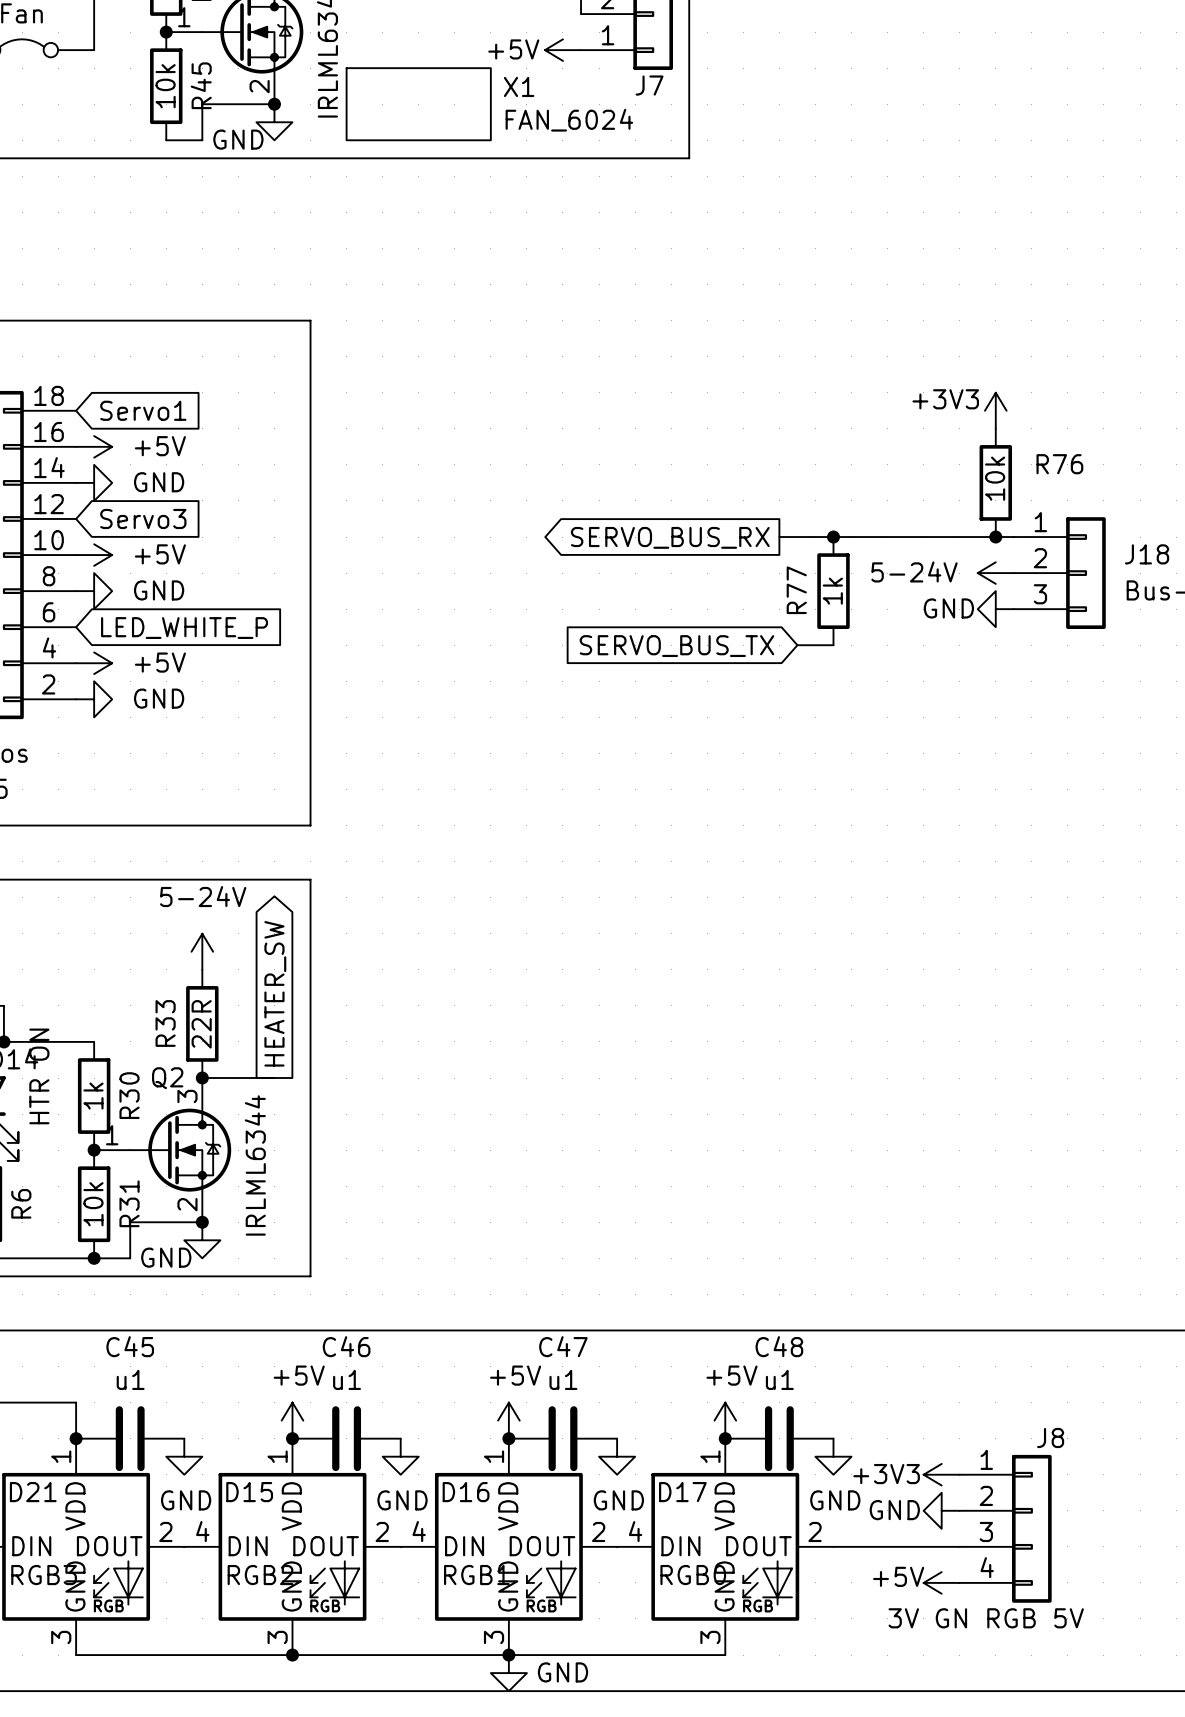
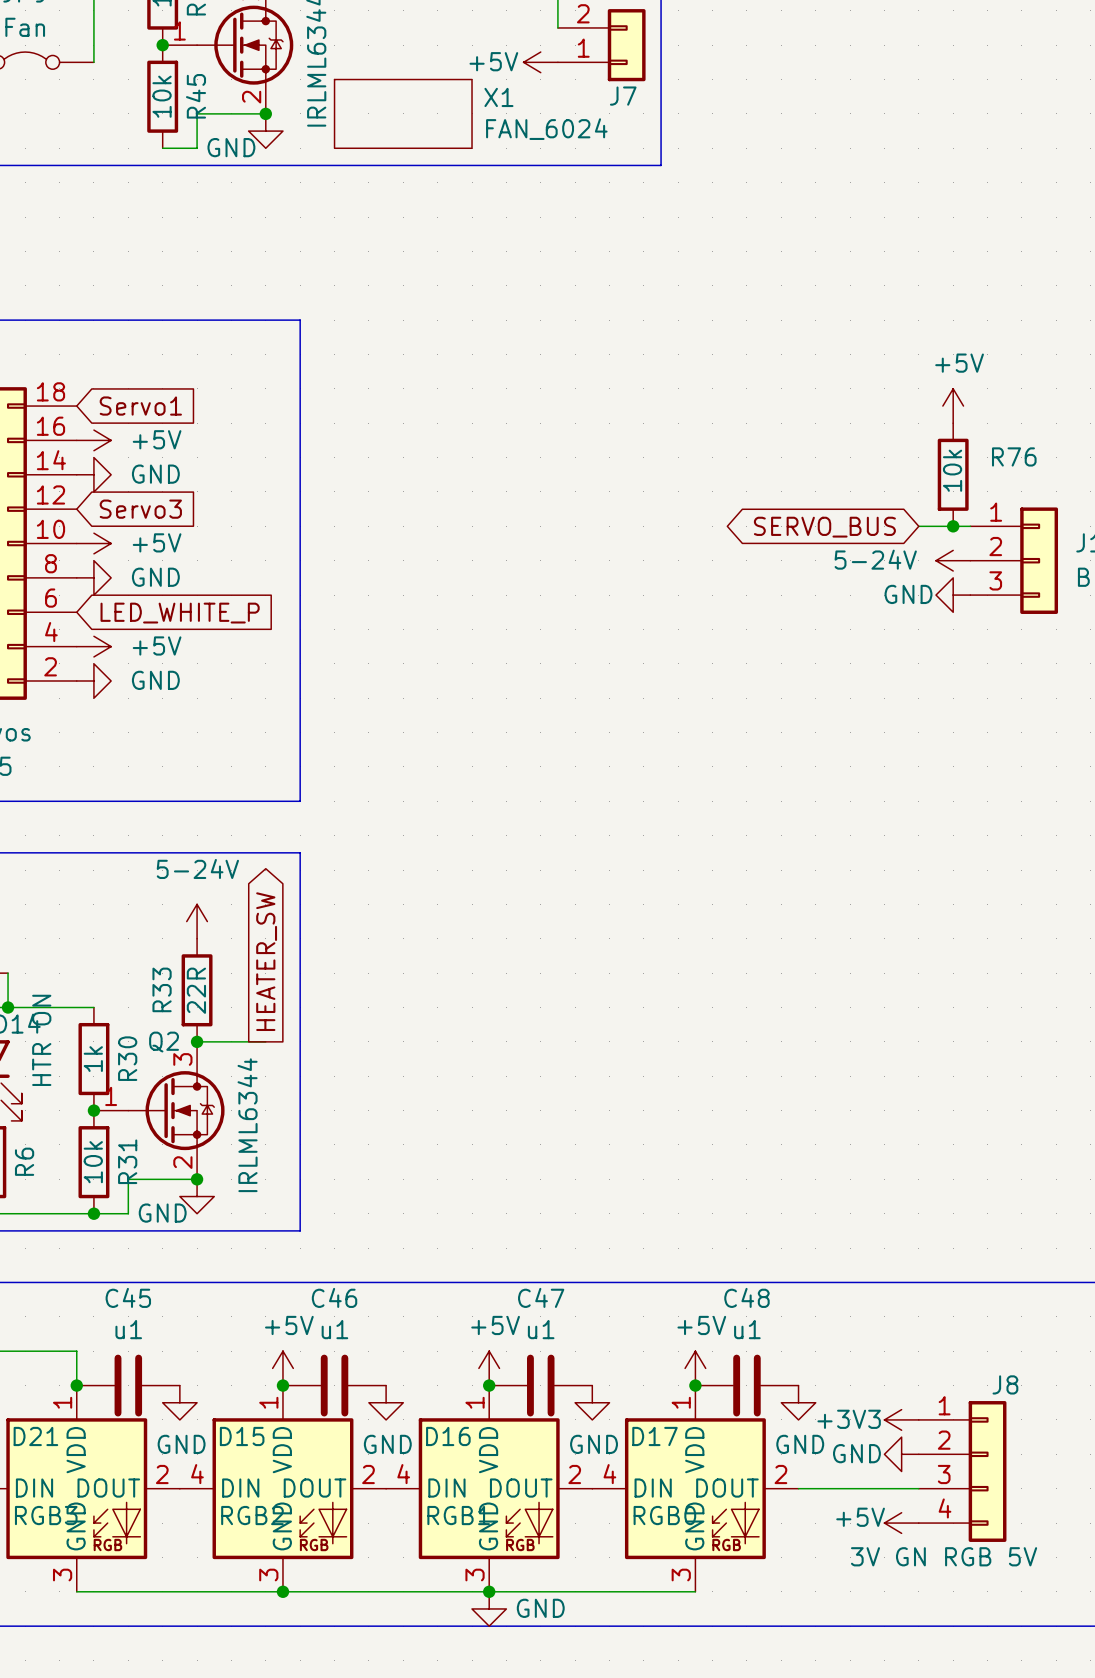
power symbol: +3V3 (995, 410) -> +5V (953, 406)
global label shape: output (670, 537) -> bidirectional (824, 527)
global label: SERVO_BUS_RX (670, 537) -> SERVO_BUS (824, 527)
wire: (779, 537) (959, 537) -> none
junction: (833, 537) -> none
R77: 1k (833, 591) -> none
wire: (797, 645) (833, 645) -> none
global label: SERVO_BUS_TX (676, 646) -> none

